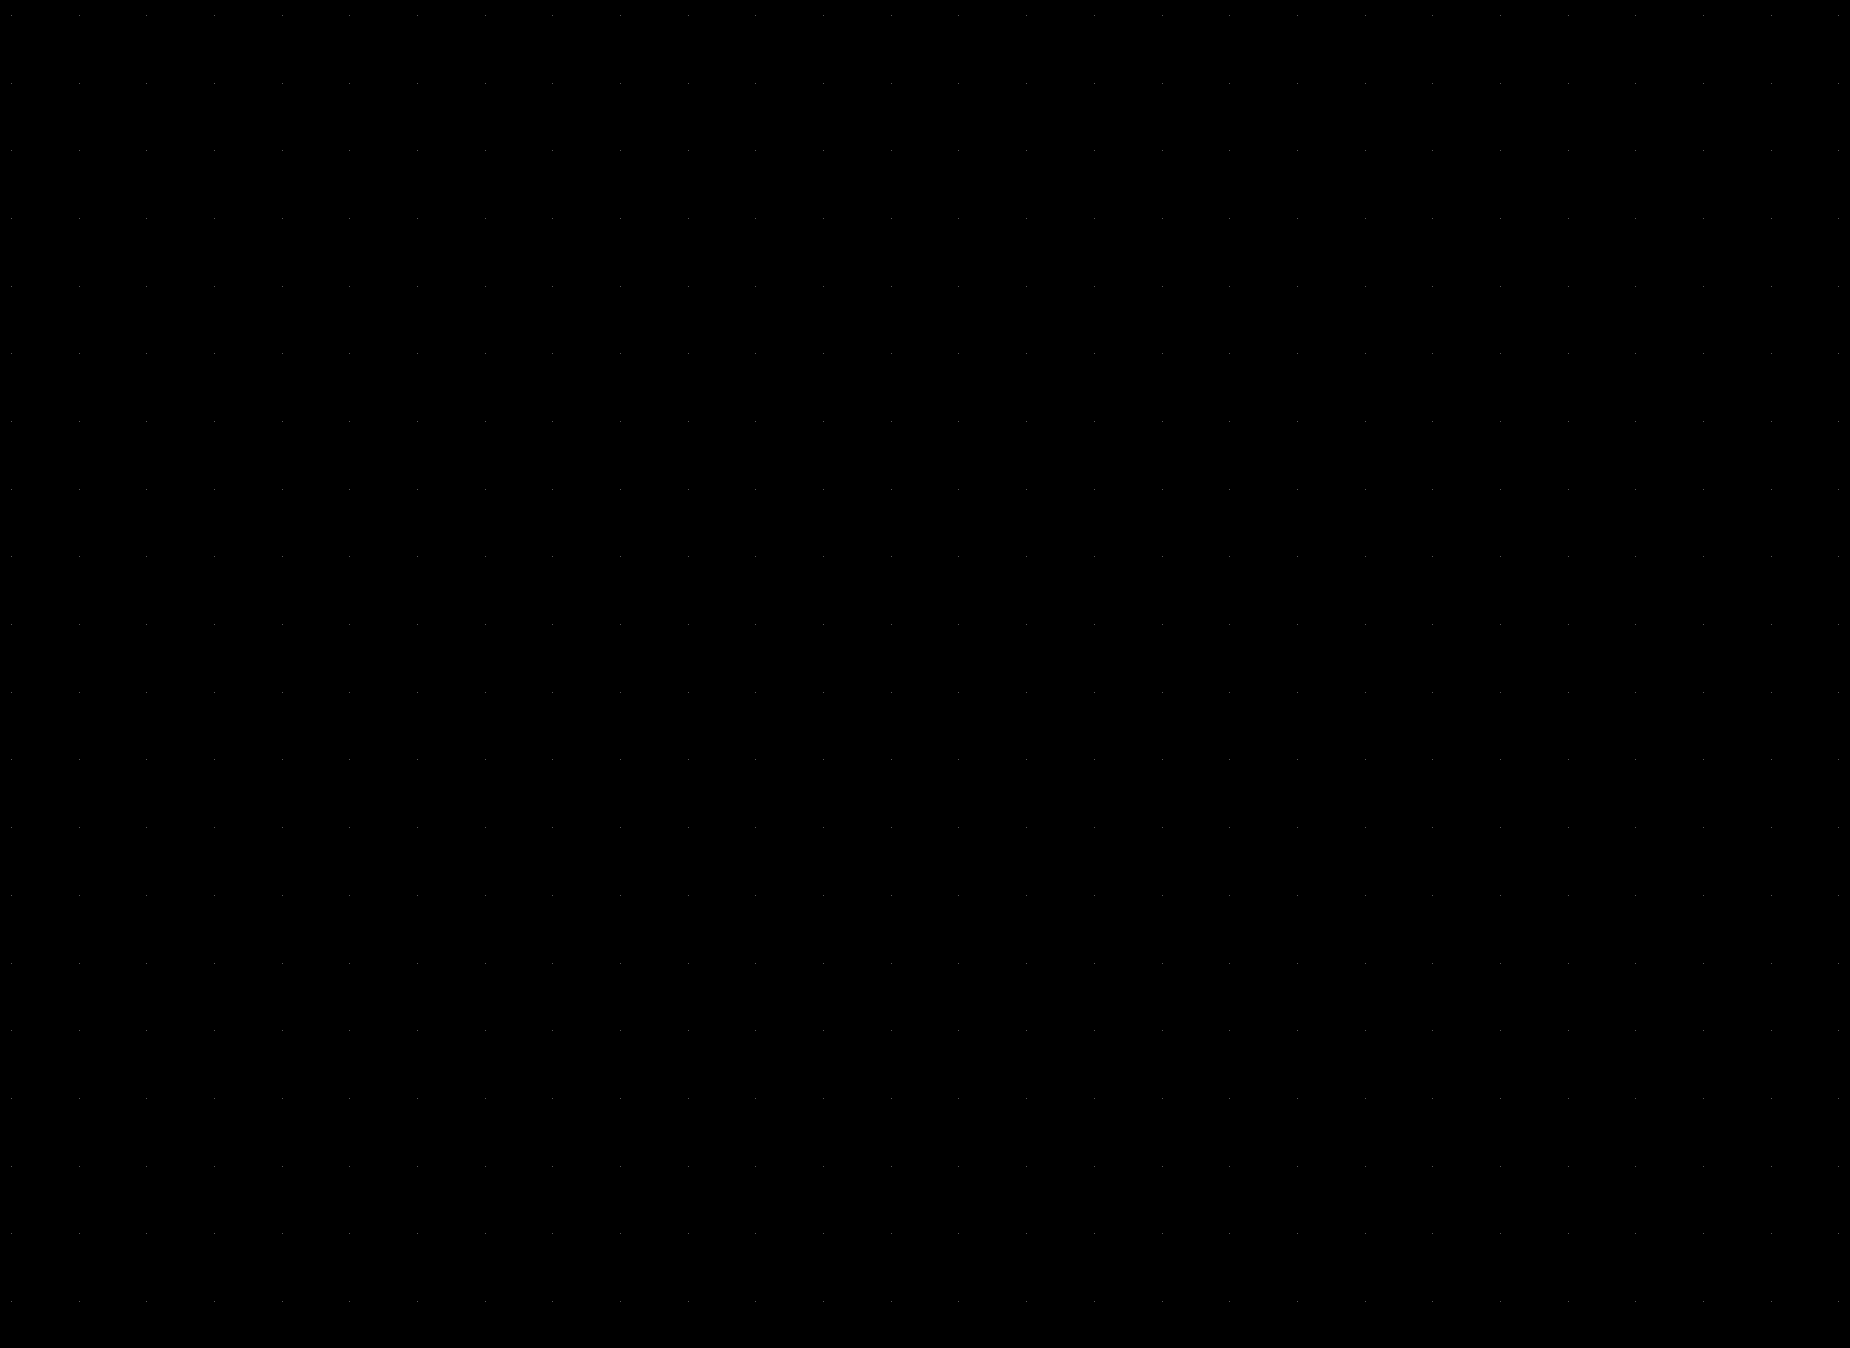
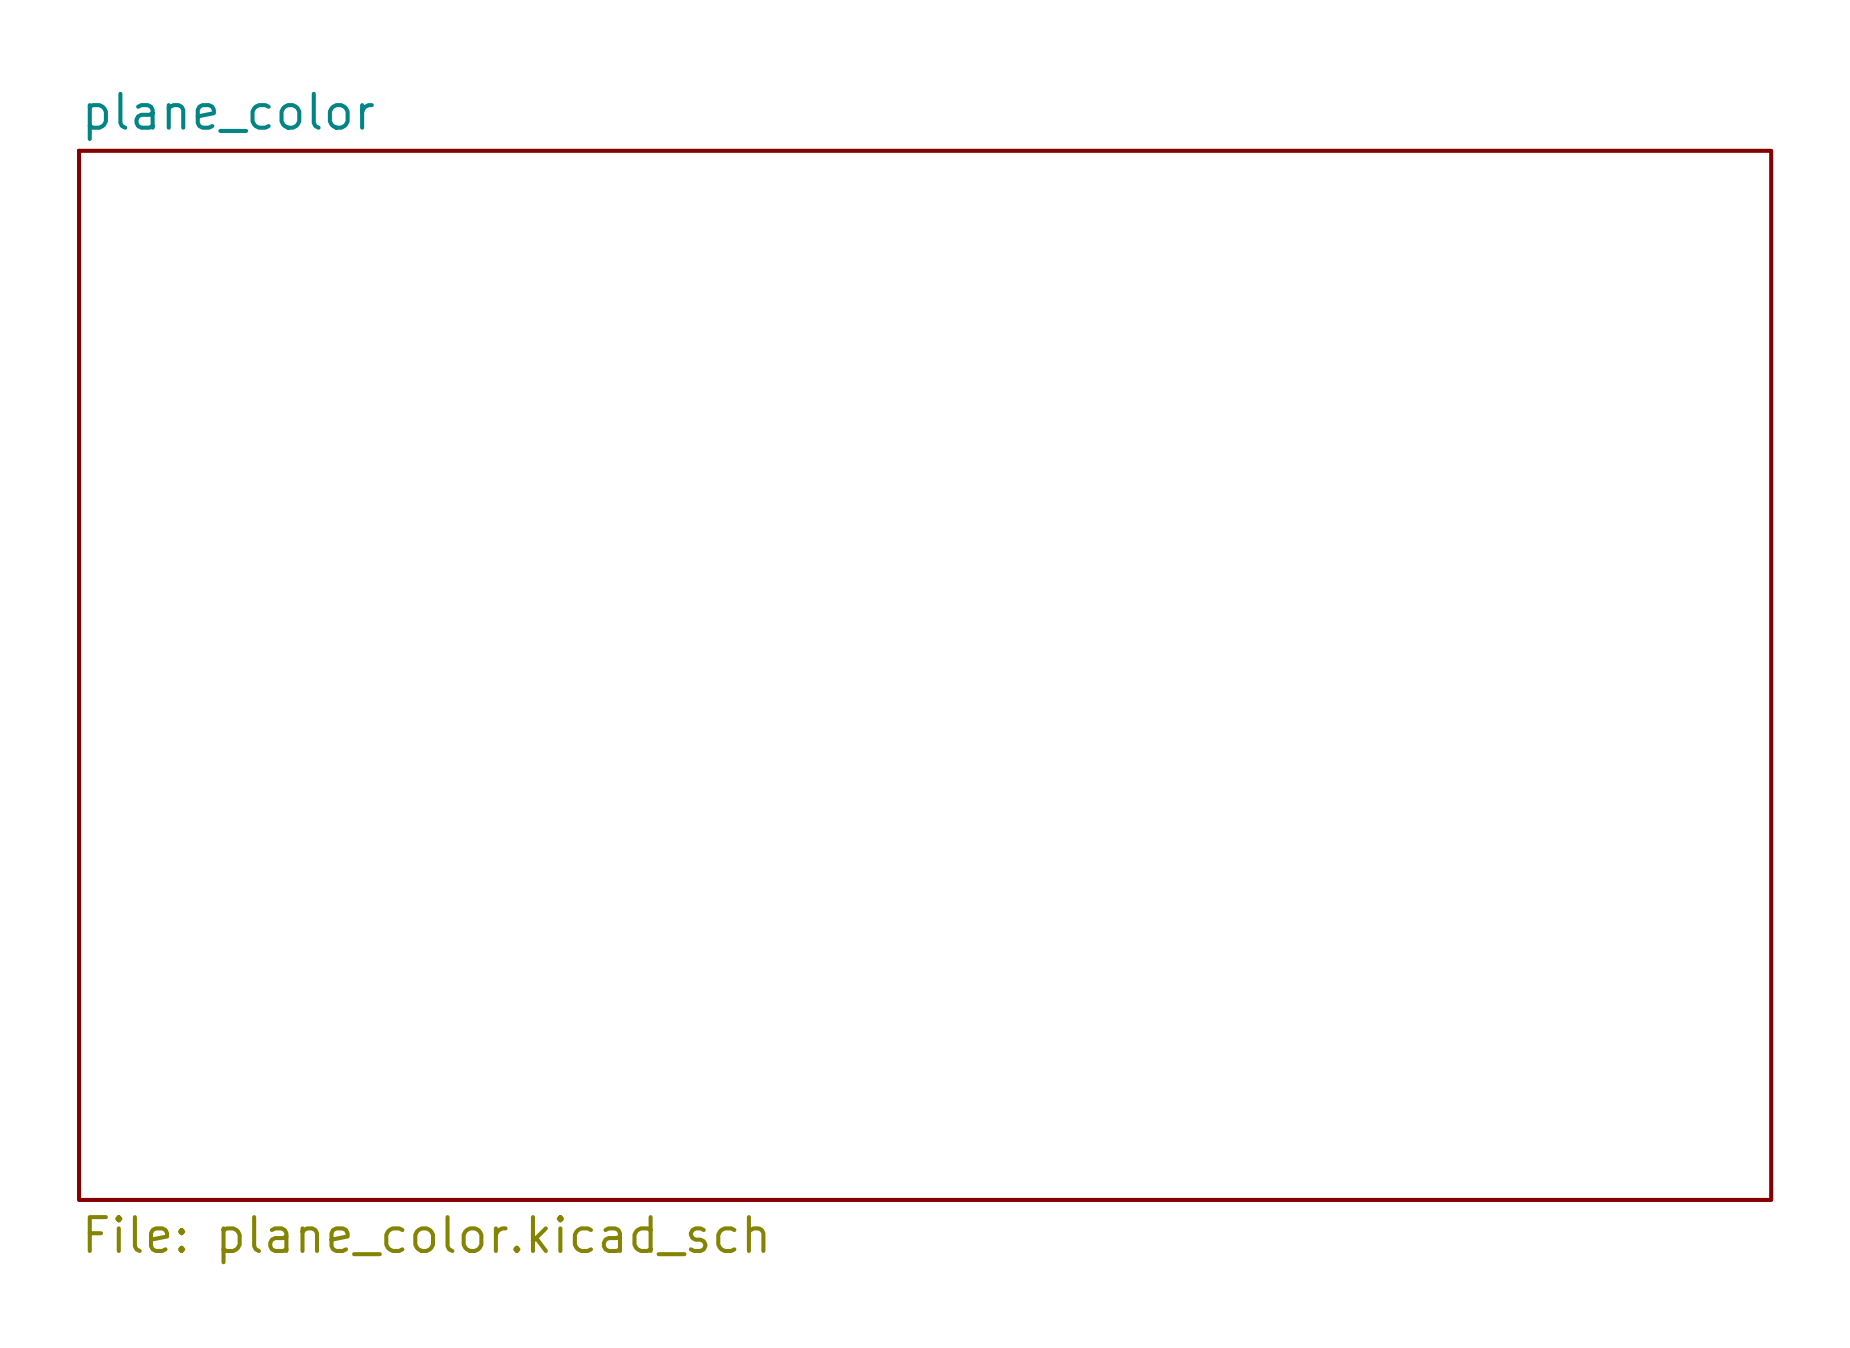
sheet plane_color: none -> File: plane_color.kicad_sch (925, 675)

